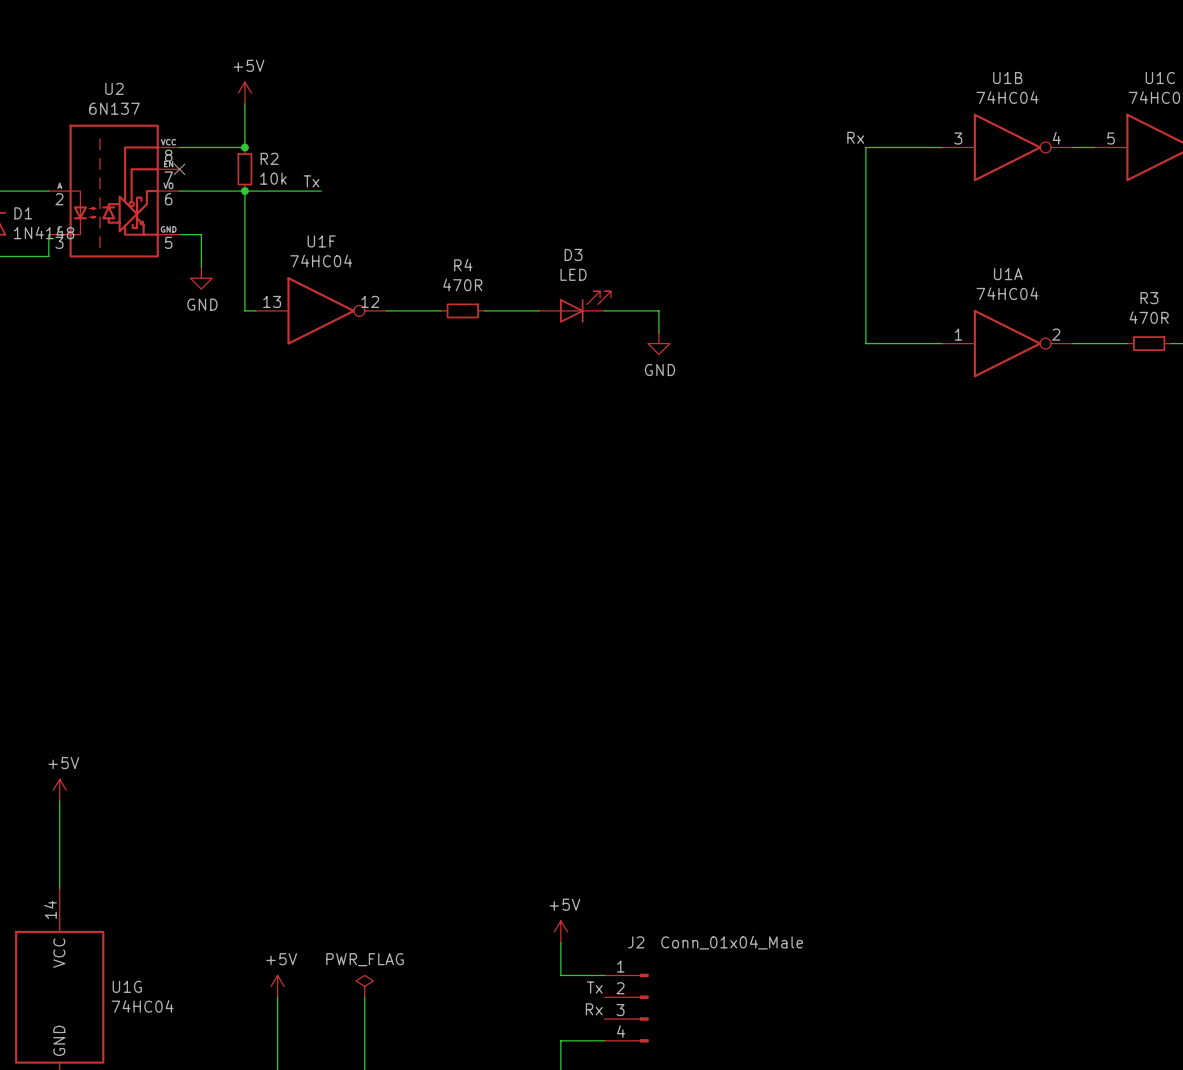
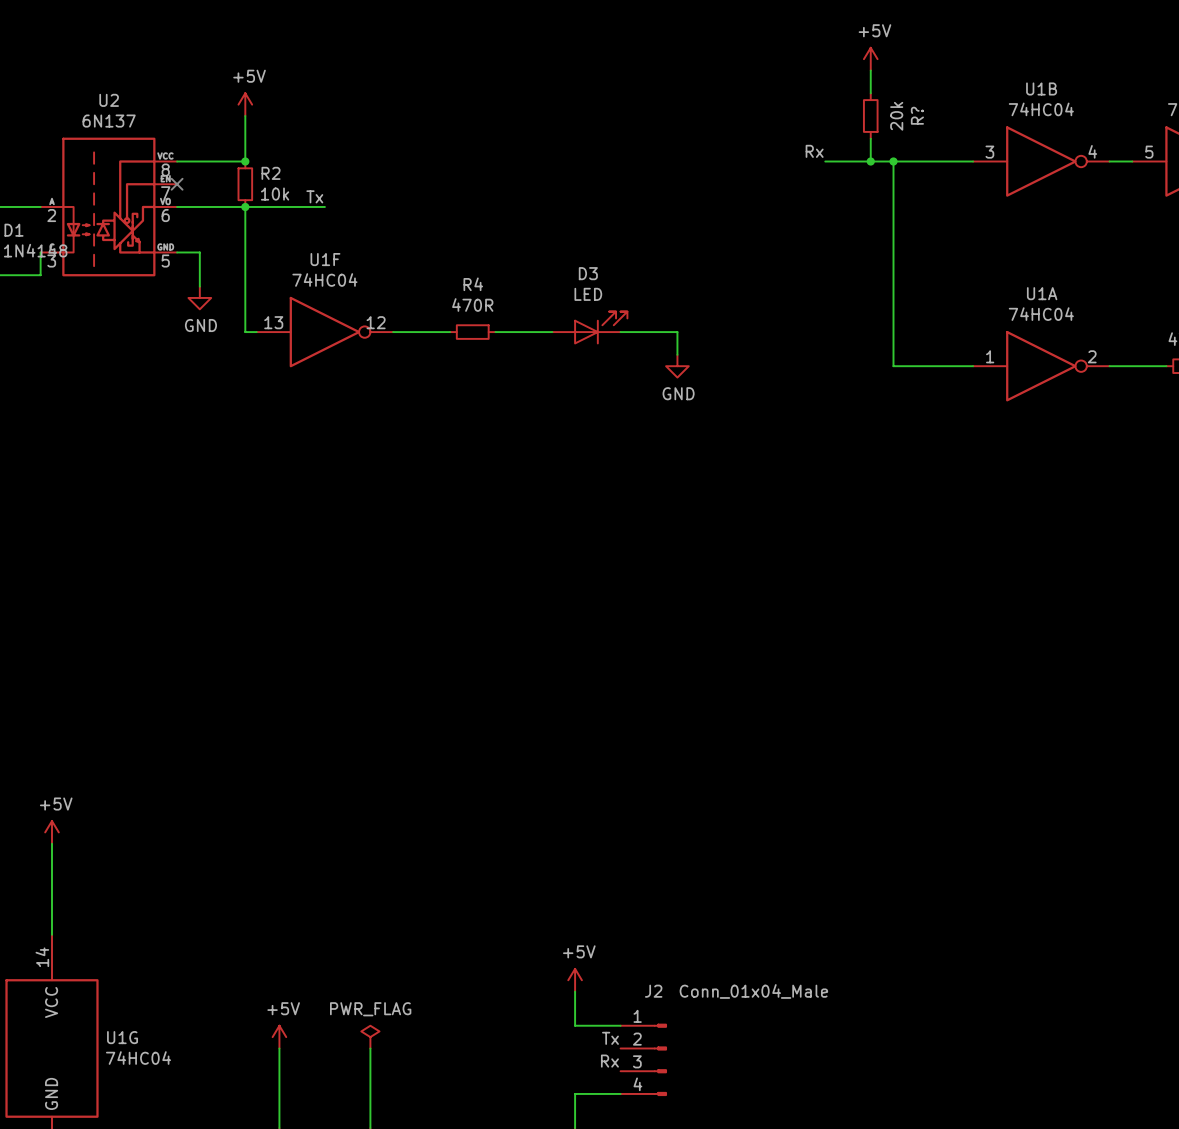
power symbol: none -> +5V (870, 59)
wire: none -> (870, 70) (870, 93)
R?: none -> 20k (870, 116)
wire: none -> (870, 138) (870, 161)
label position: Rx (855, 137) -> Rx (814, 151)
wire: none -> (825, 161) (893, 161)
junction: none -> (870, 161)
junction: none -> (893, 161)

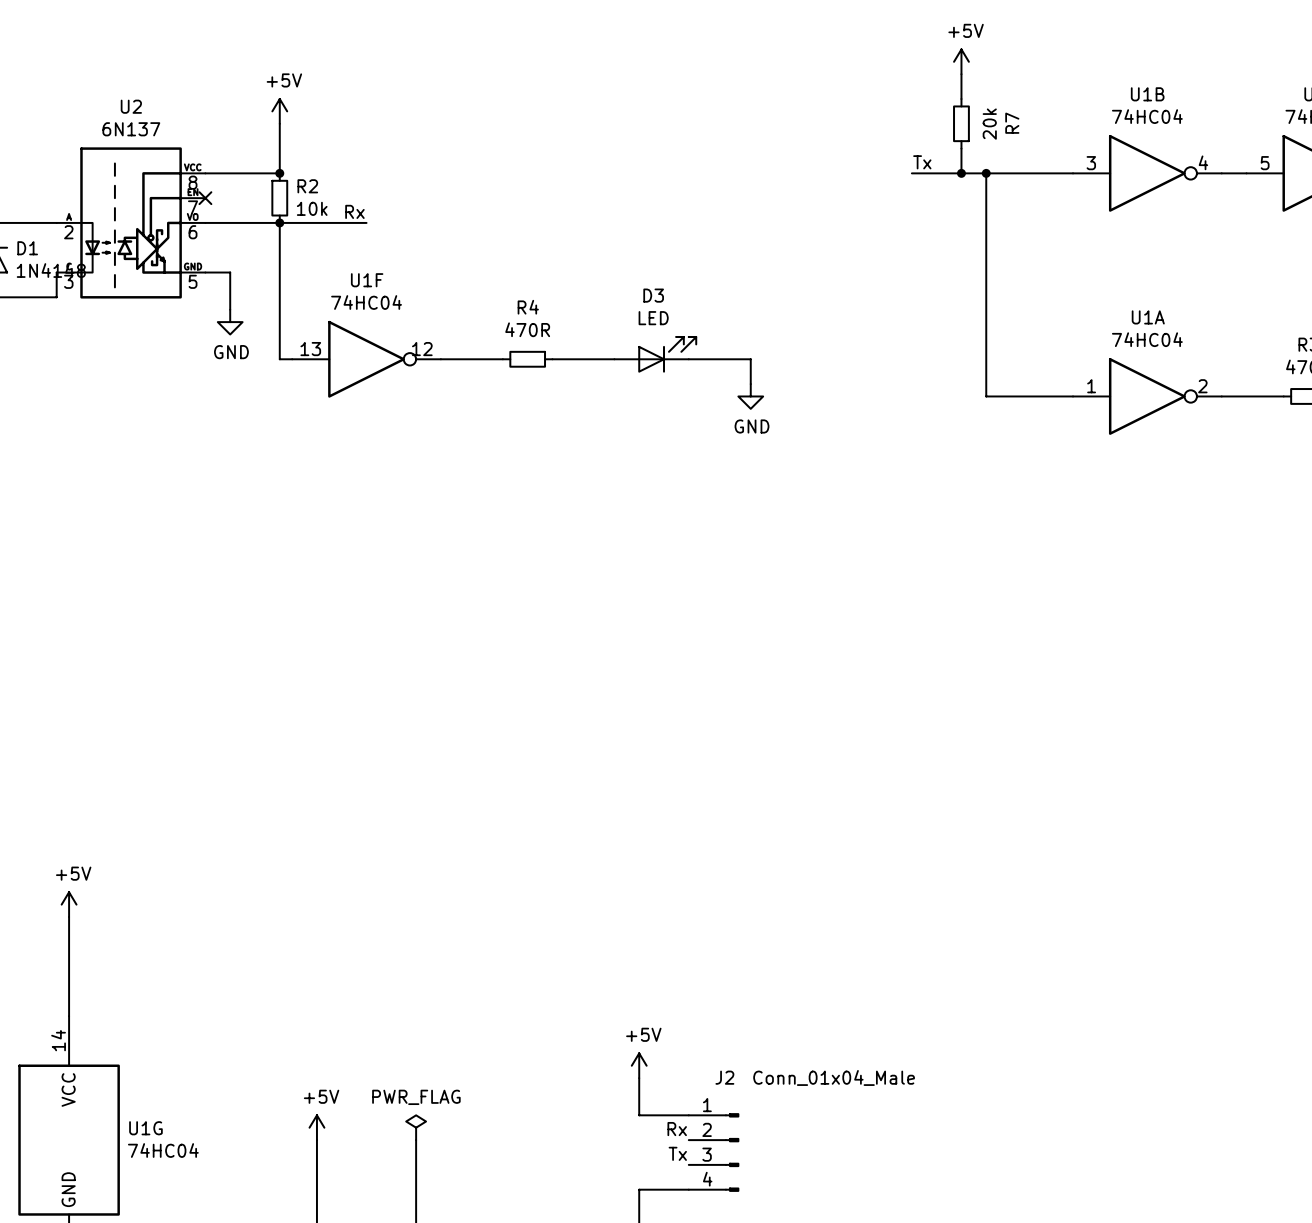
R? name: R? (917, 115) -> R7 (1012, 123)
label: Rx (814, 151) -> Tx (922, 162)
label: Tx (314, 196) -> Rx (354, 211)
label: Tx (610, 1038) -> Rx (677, 1129)
label: Rx (609, 1061) -> Tx (677, 1153)

